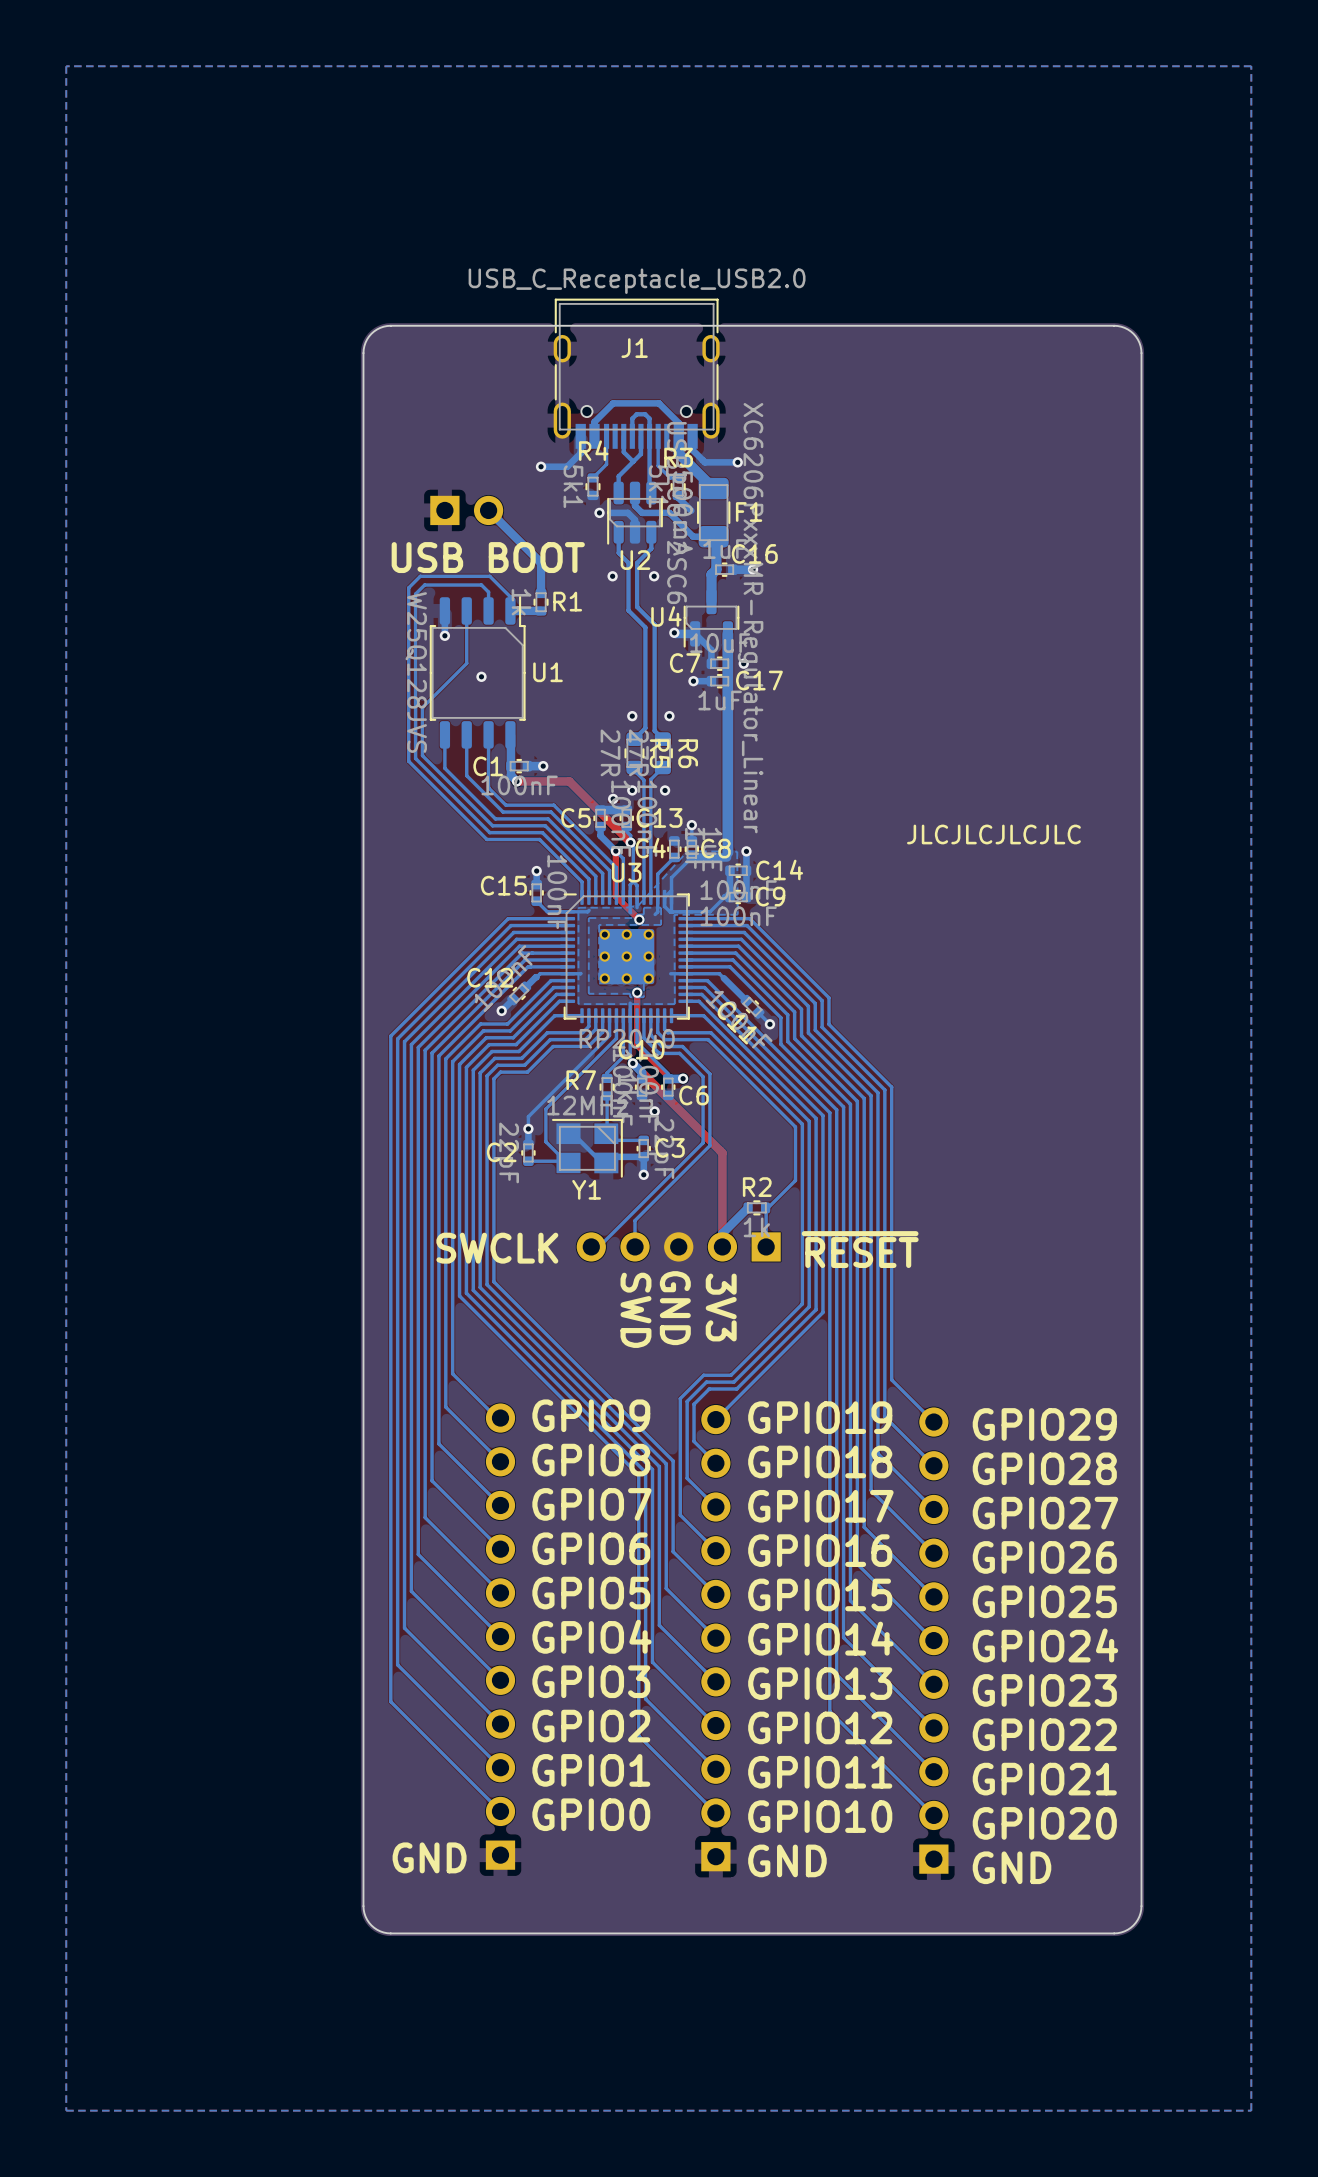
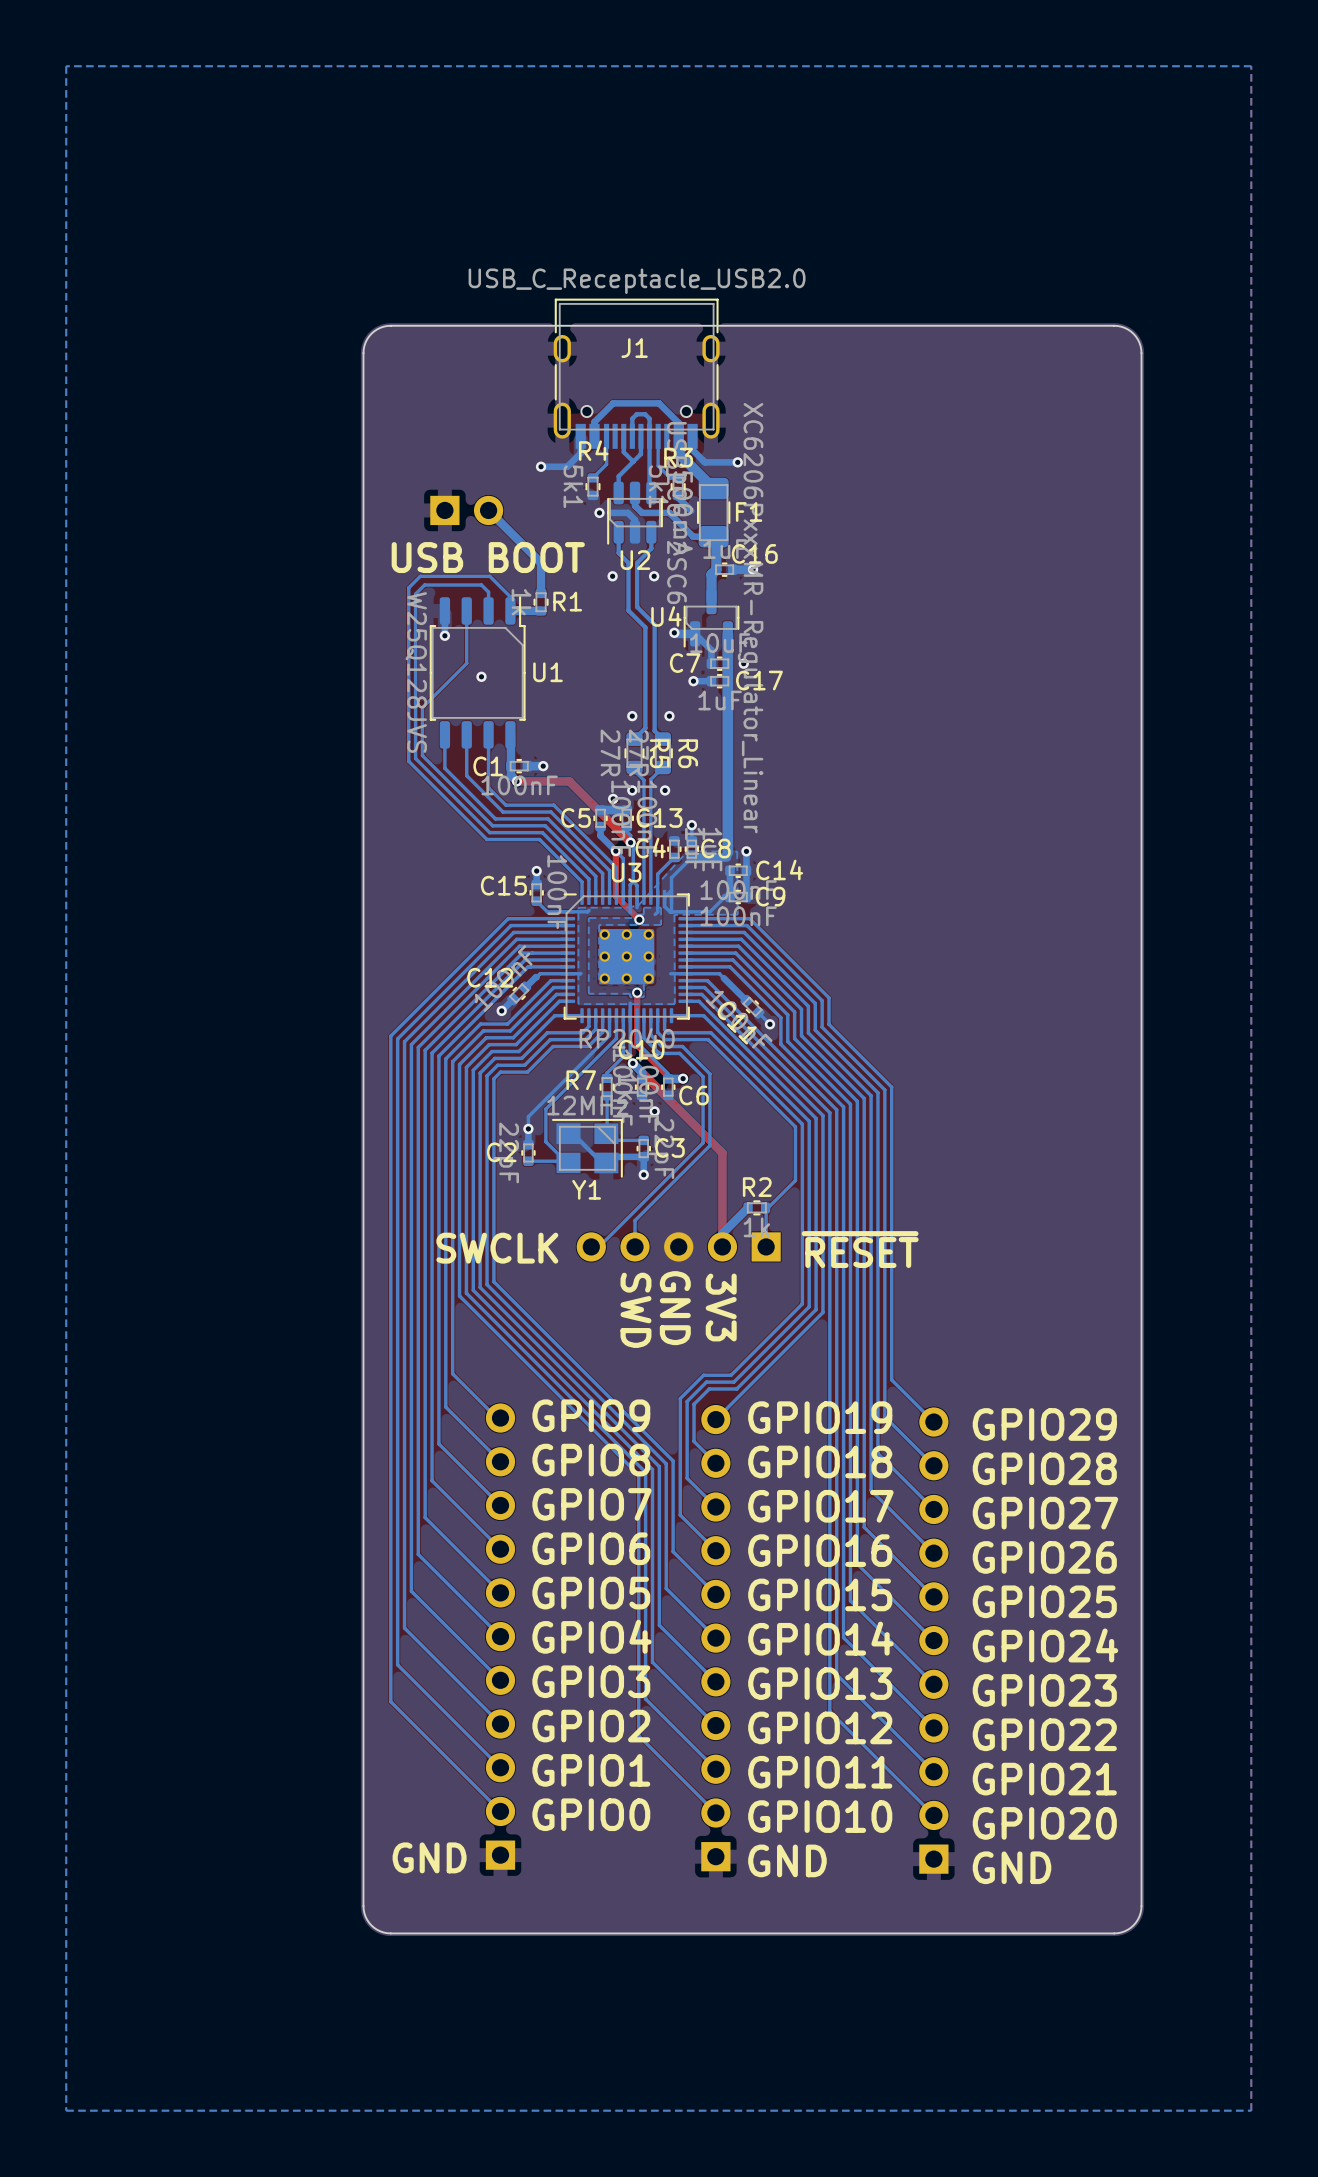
text: JLCJLCJLCJLC (993, 834) -> none

